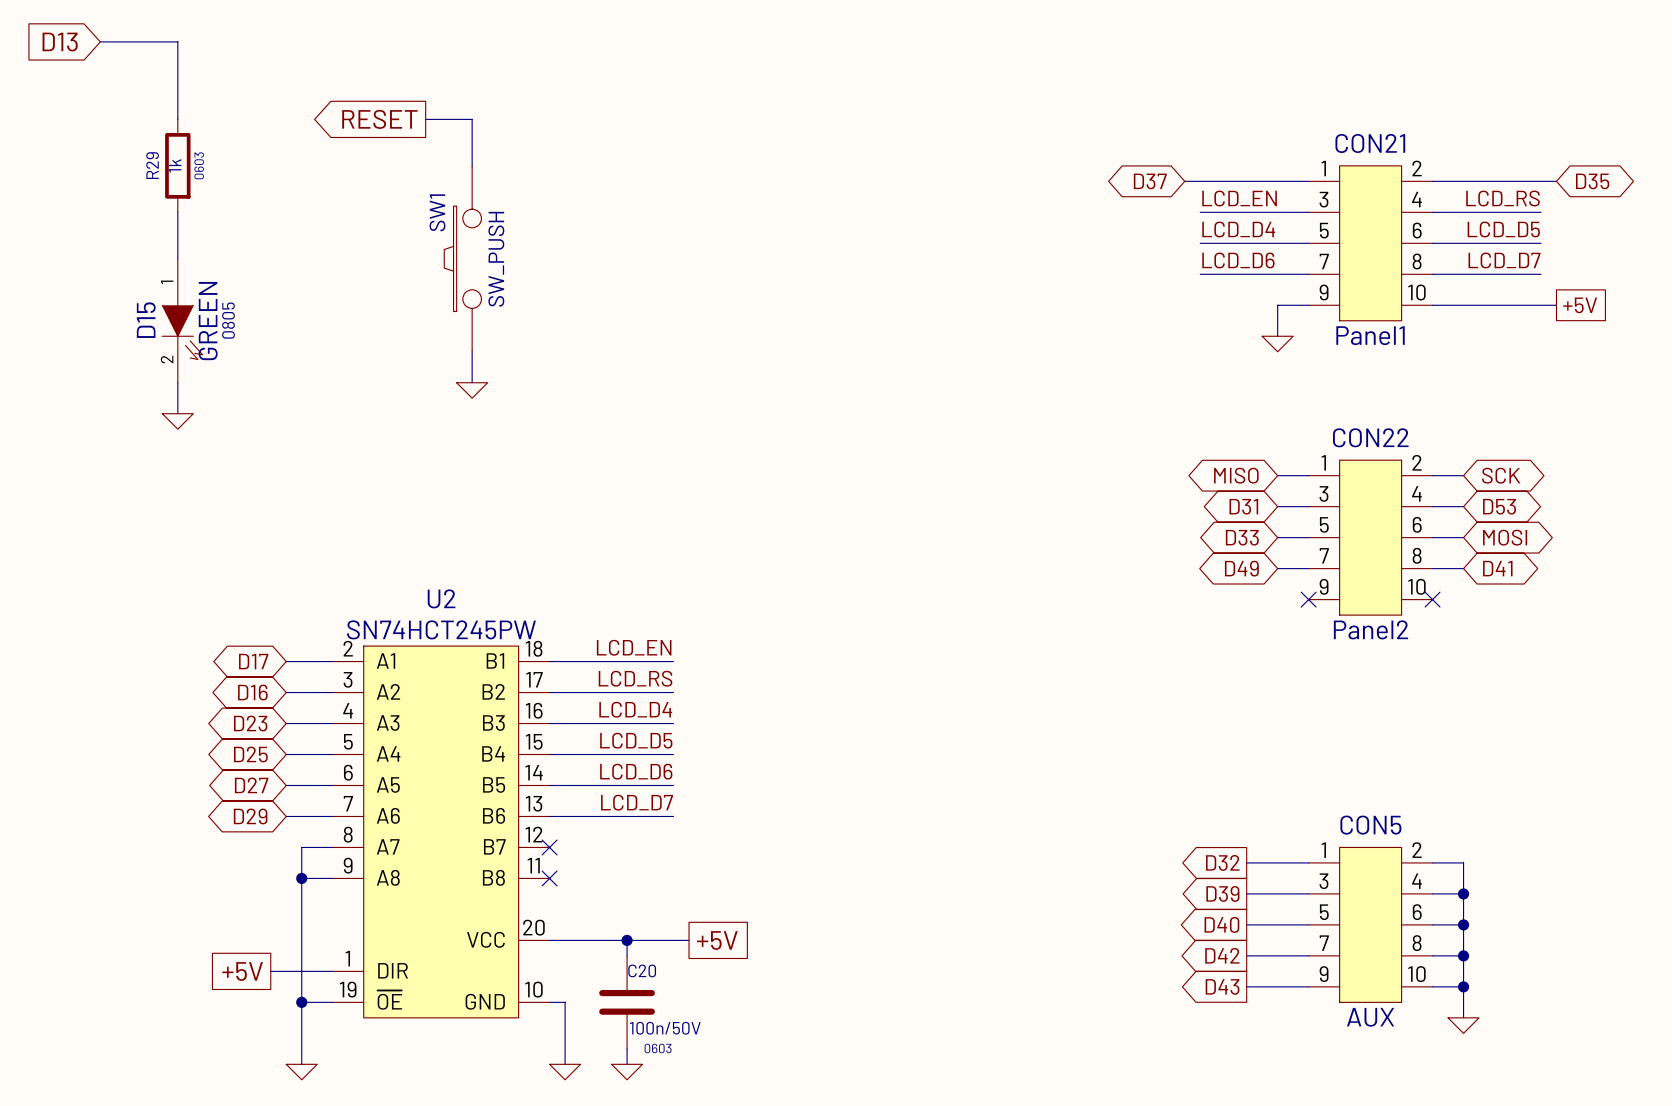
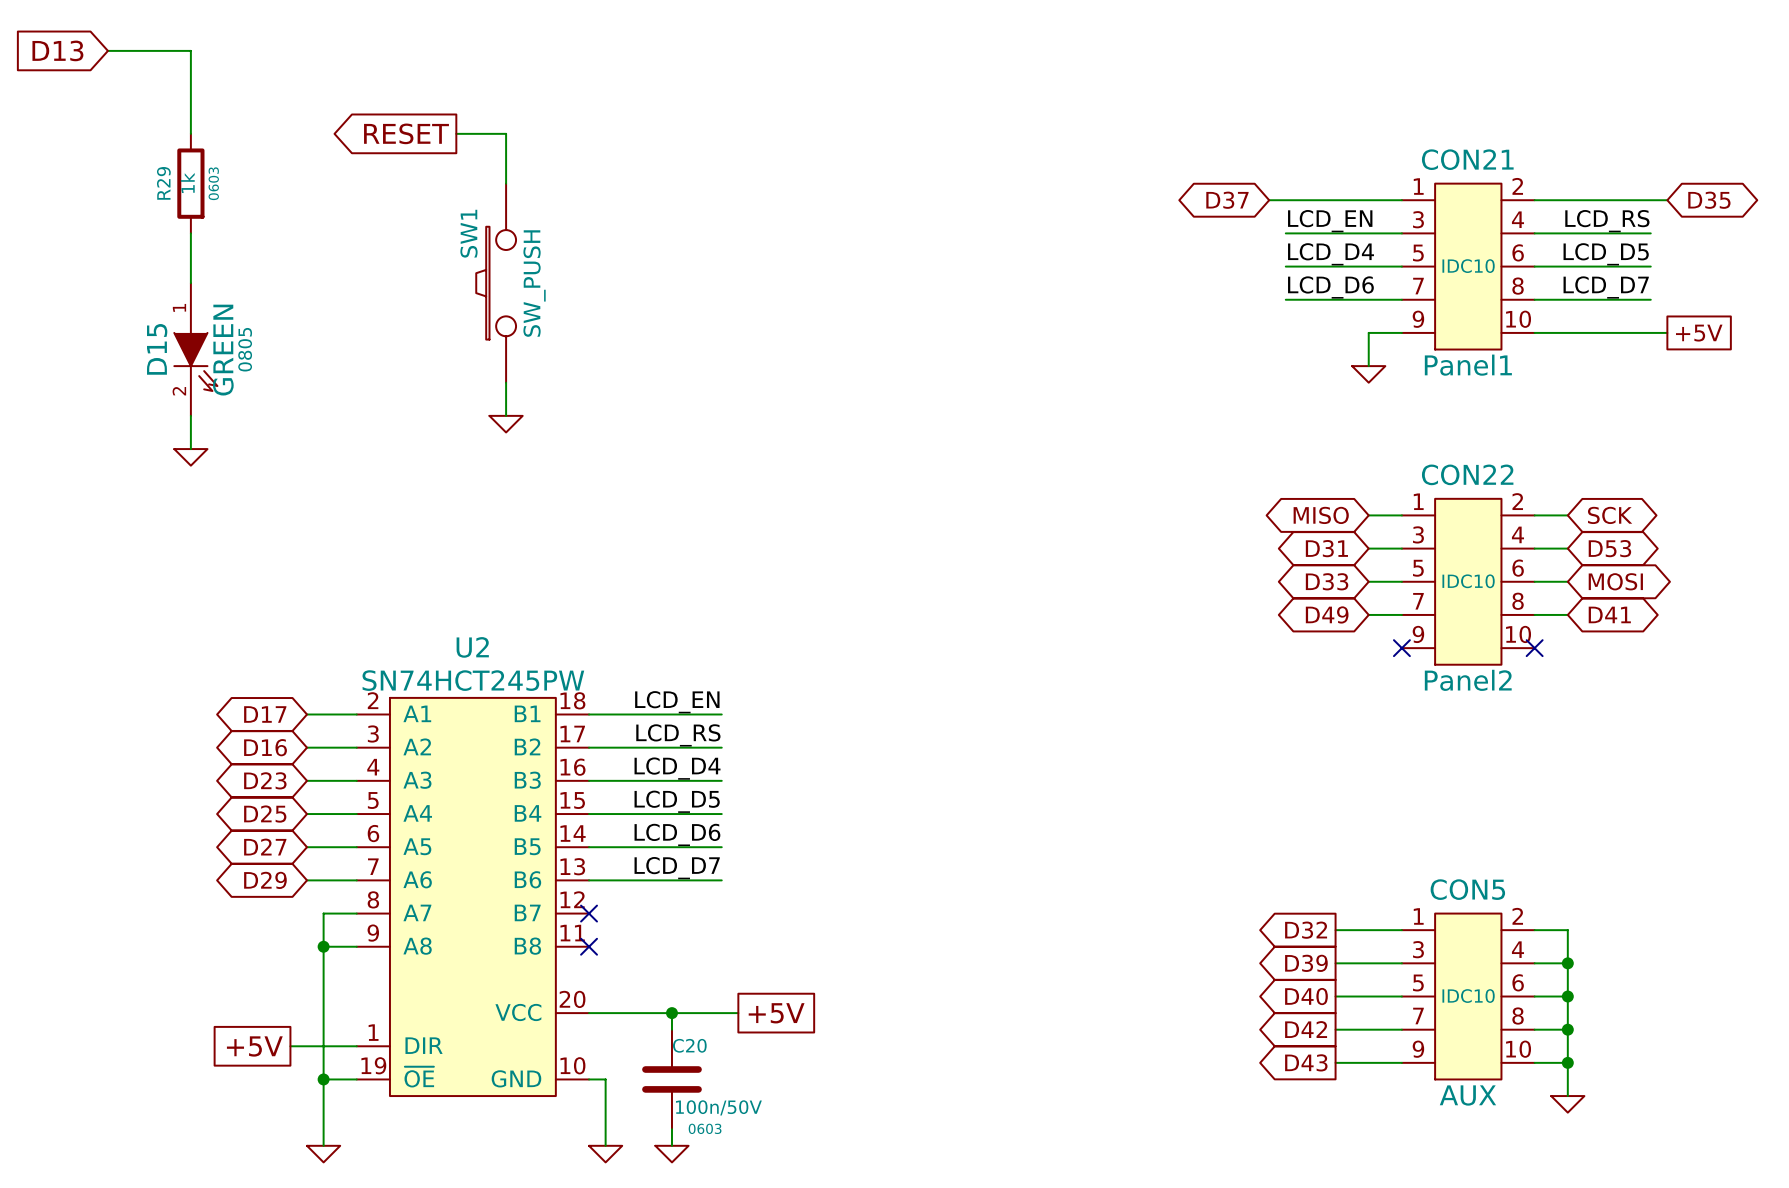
CON21 text: none -> IDC10 (1468, 266)
CON22 text: none -> IDC10 (1468, 581)
CON5 text: none -> IDC10 (1468, 996)

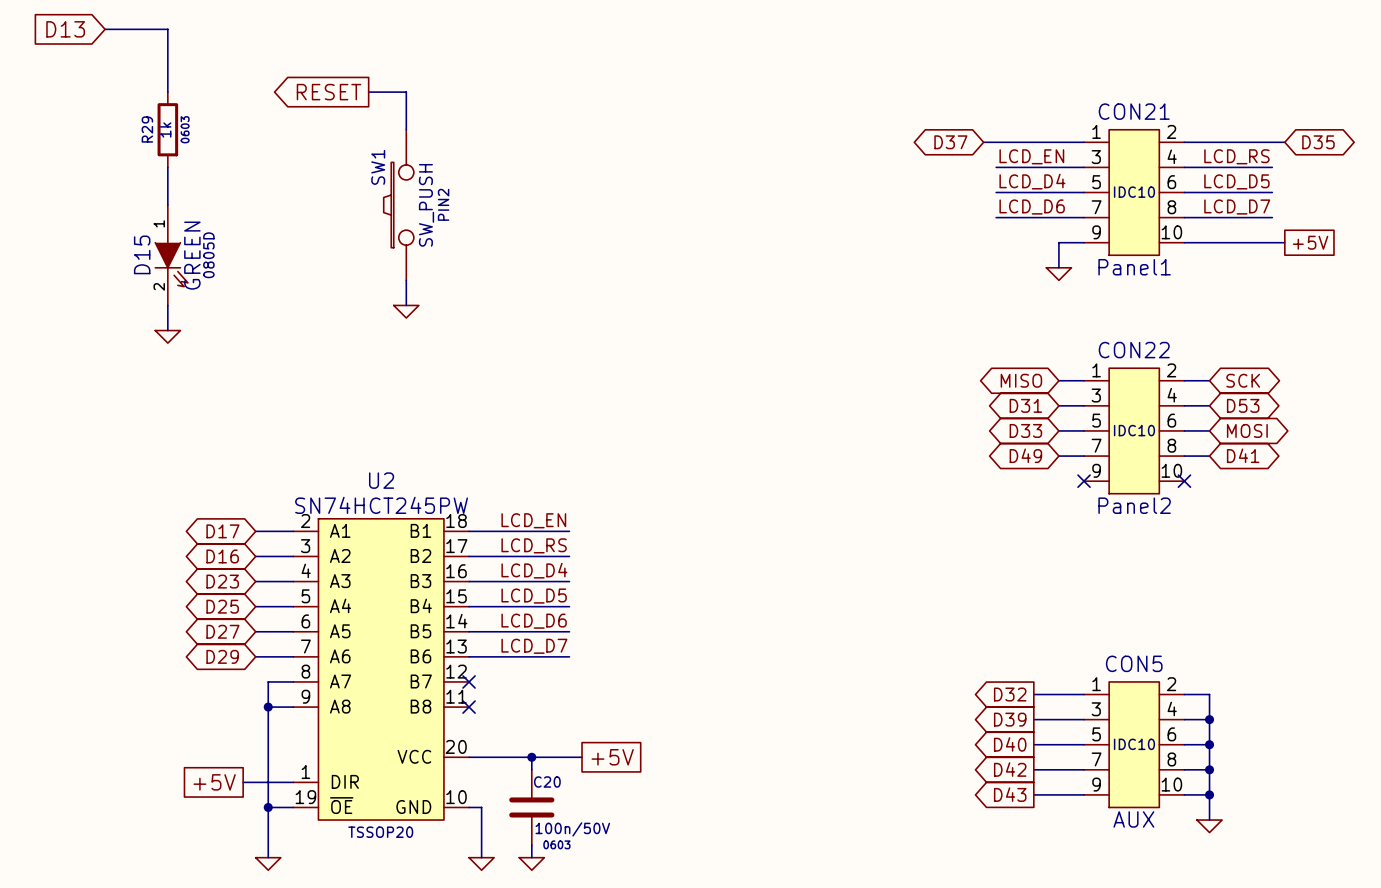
SW1 text: none -> PIN2 (443, 204)
D15 text: 0805 (245, 349) -> 0805D (208, 255)
U2 text: none -> TSSOP20 (380, 832)

